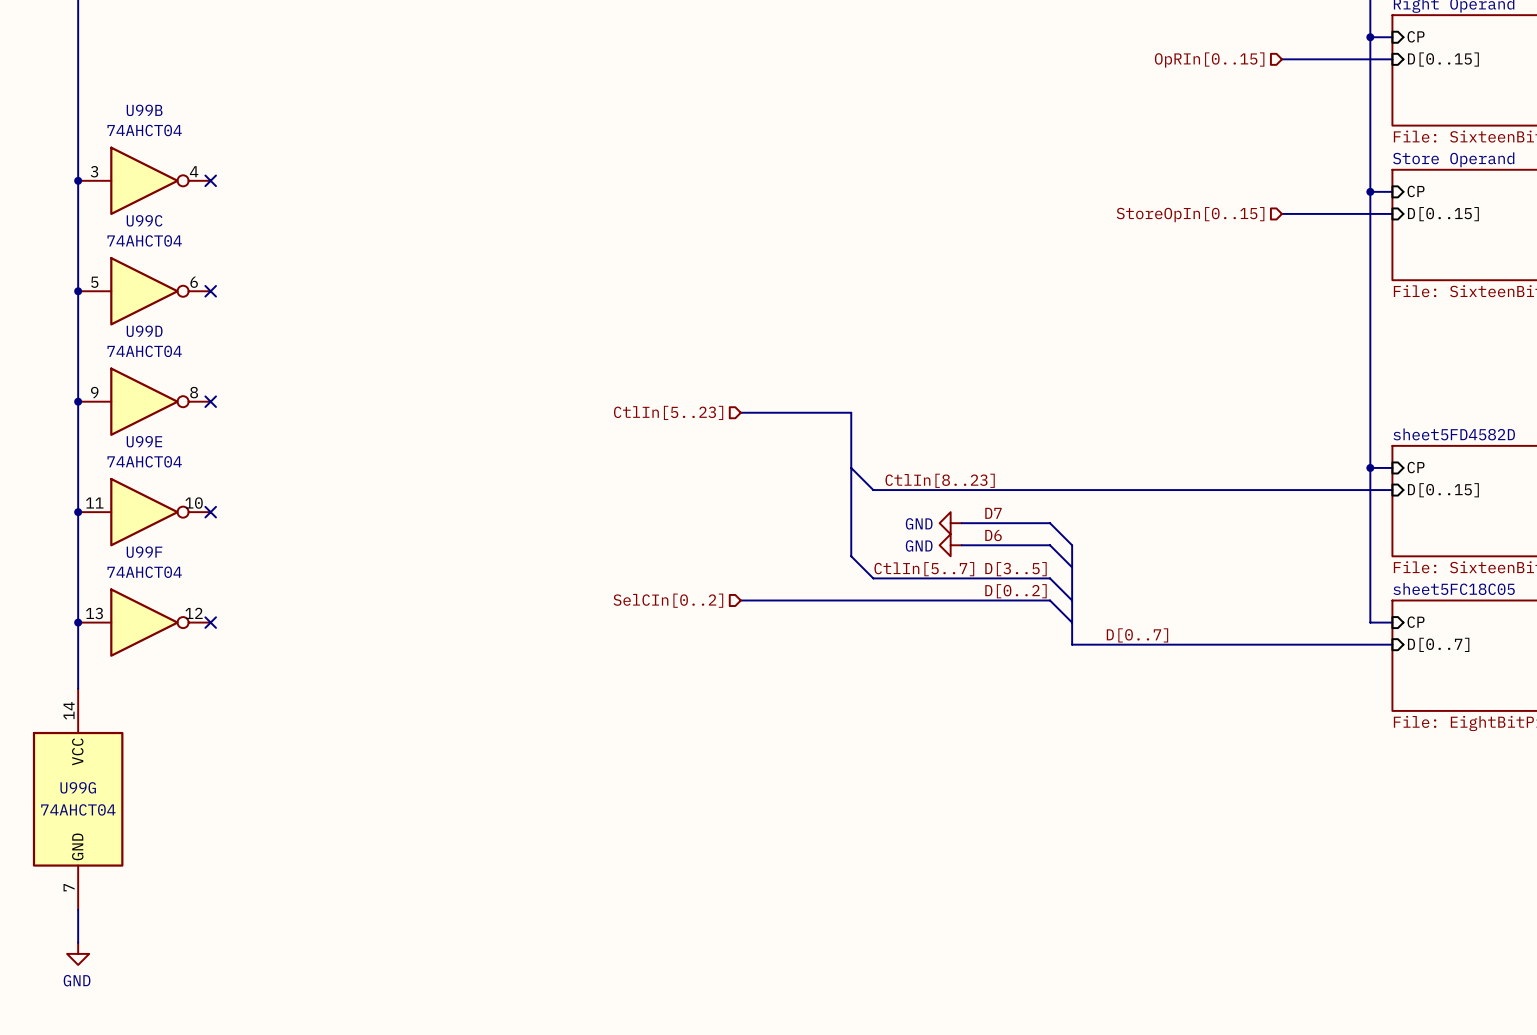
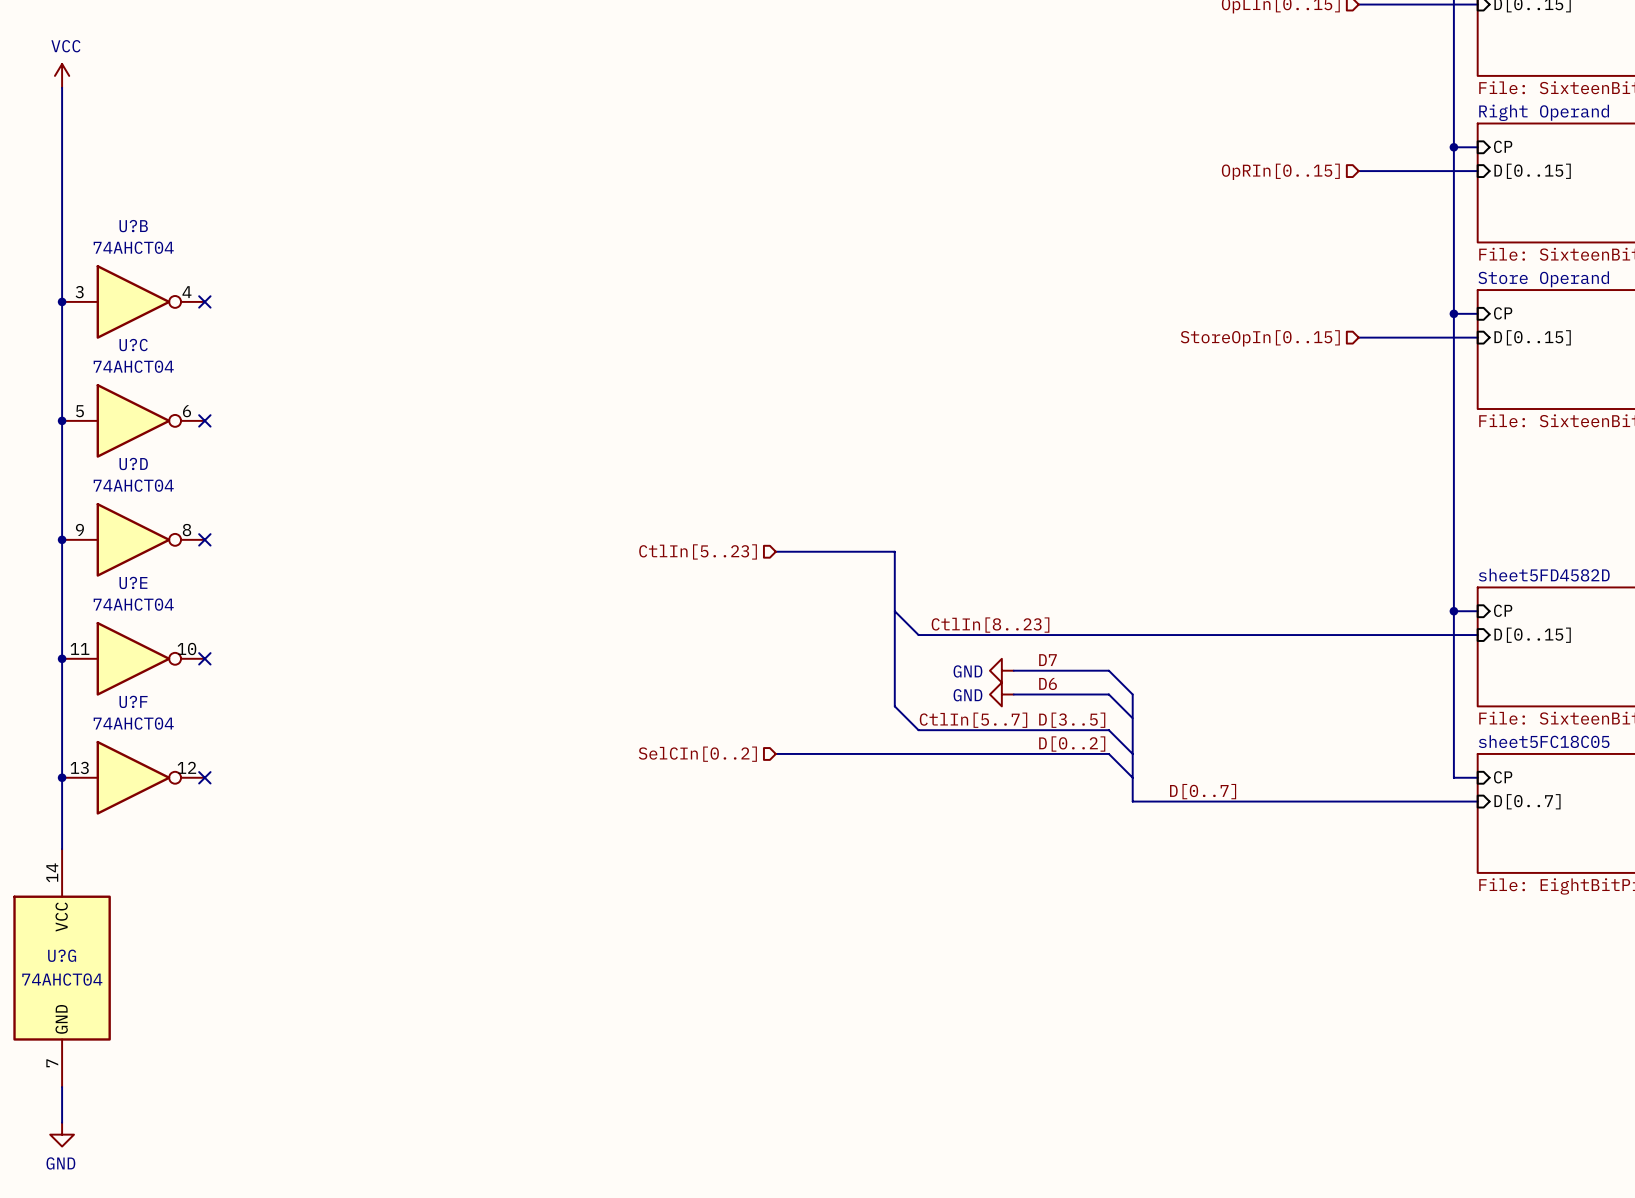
U99B name: U99B (144, 110) -> U?B (133, 226)
U99C name: U99C (144, 220) -> U?C (133, 345)
U99D name: U99D (144, 331) -> U?D (133, 463)
U99E name: U99E (144, 441) -> U?E (133, 582)
U99F name: U99F (144, 552) -> U?F (133, 701)
U99G name: U99G (78, 787) -> U?G (62, 955)

